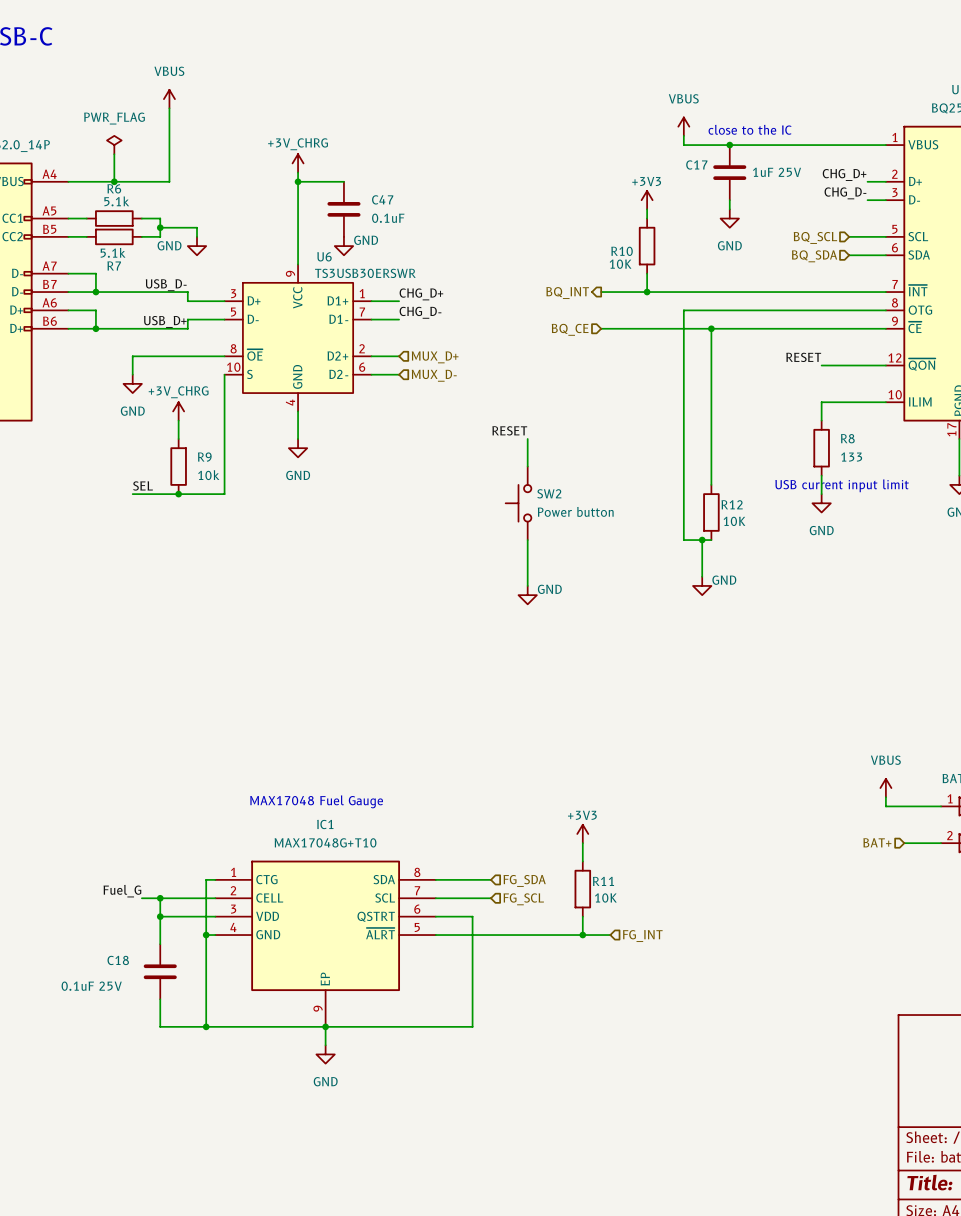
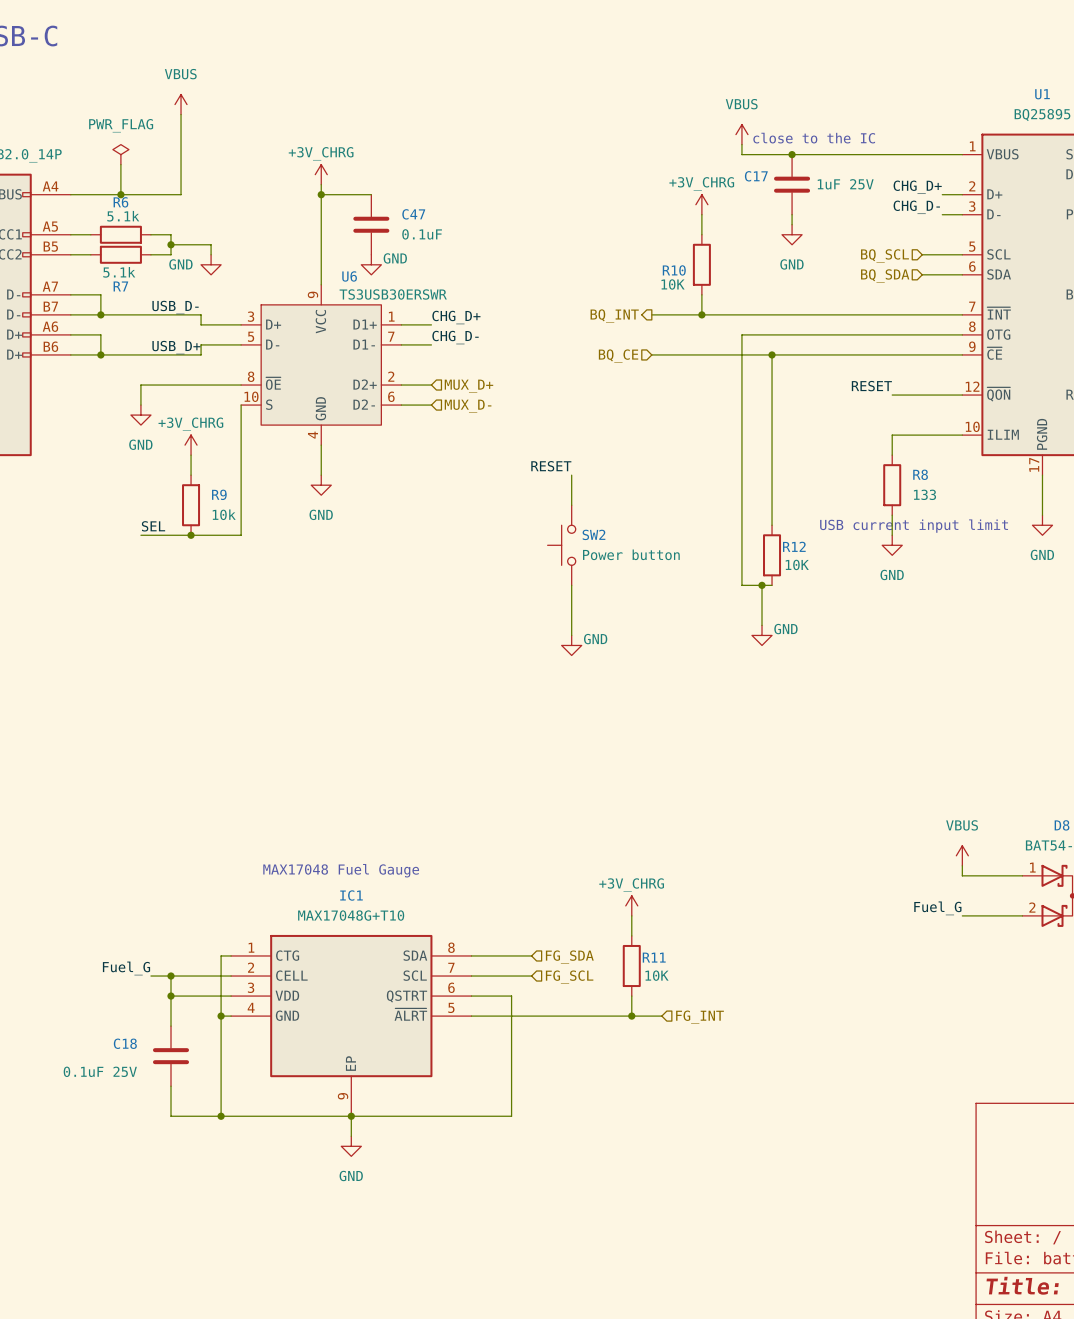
power symbol: none -> +3V_CHRG (701, 204)
power symbol: +3V3 (647, 200) -> none
power symbol: +3V3 (582, 833) -> +3V_CHRG (631, 905)
label: none -> Fuel_G (937, 908)
hierarchical label: BAT+ (877, 842) -> none
wire: none -> (962, 915) (982, 915)

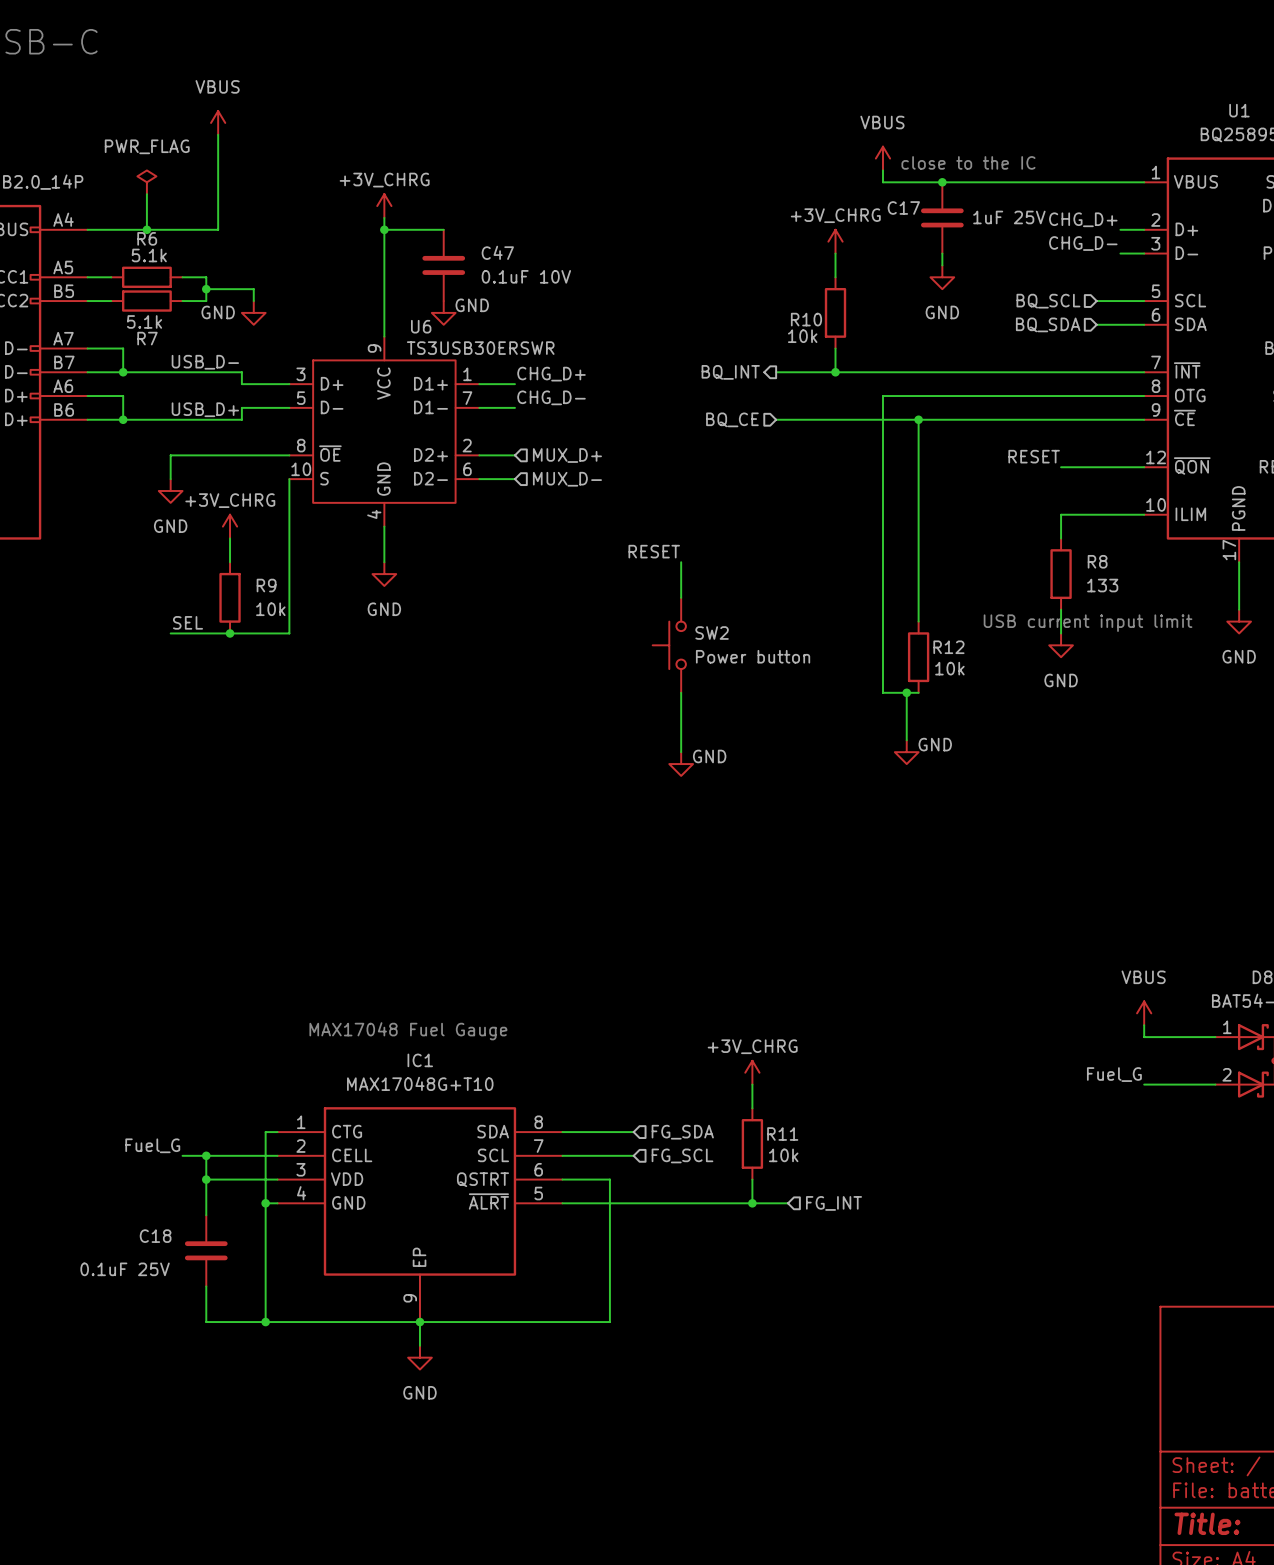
C47 value: 0.1uF (422, 234) -> 0.1uF 10V (526, 276)
R10 value: 10K (673, 284) -> 10k (802, 336)
R12 value: 10K (797, 564) -> 10k (949, 668)
R11 value: 10K (657, 975) -> 10k (783, 1155)

